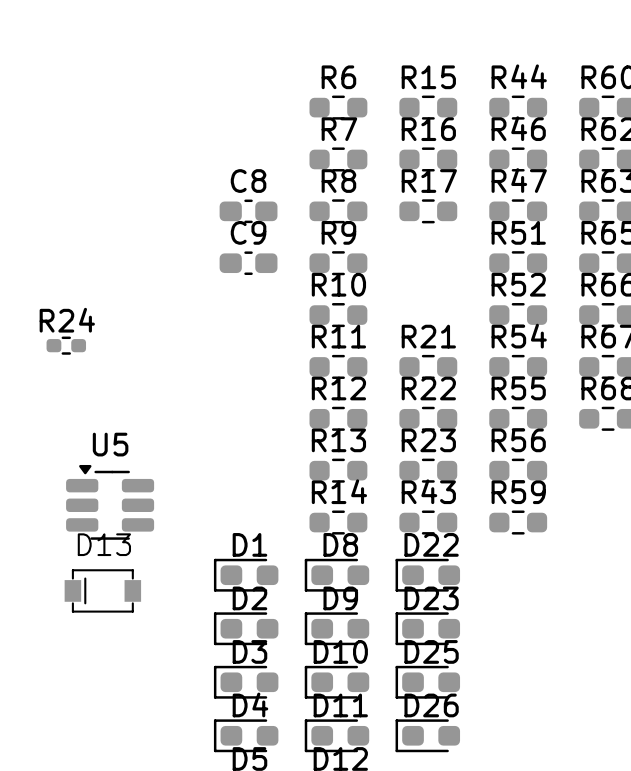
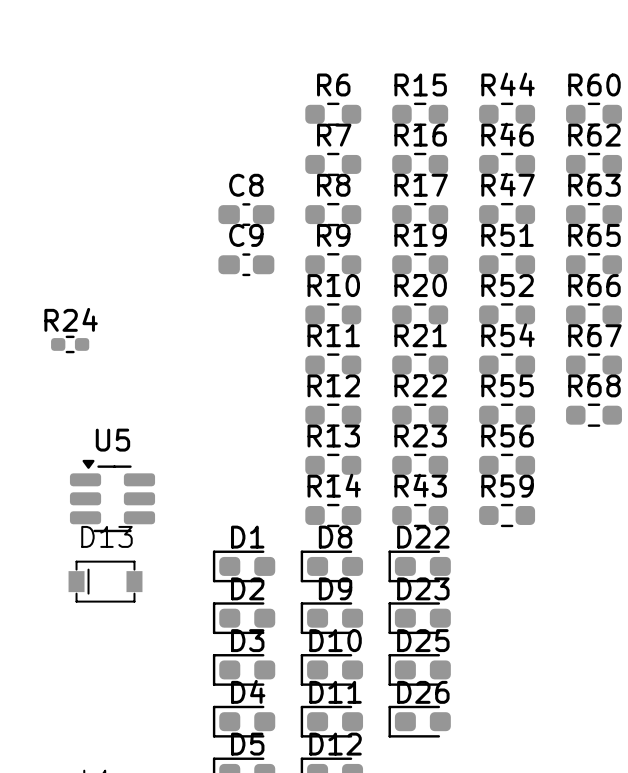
R19: none -> (420, 264)
R20: none -> (420, 314)

